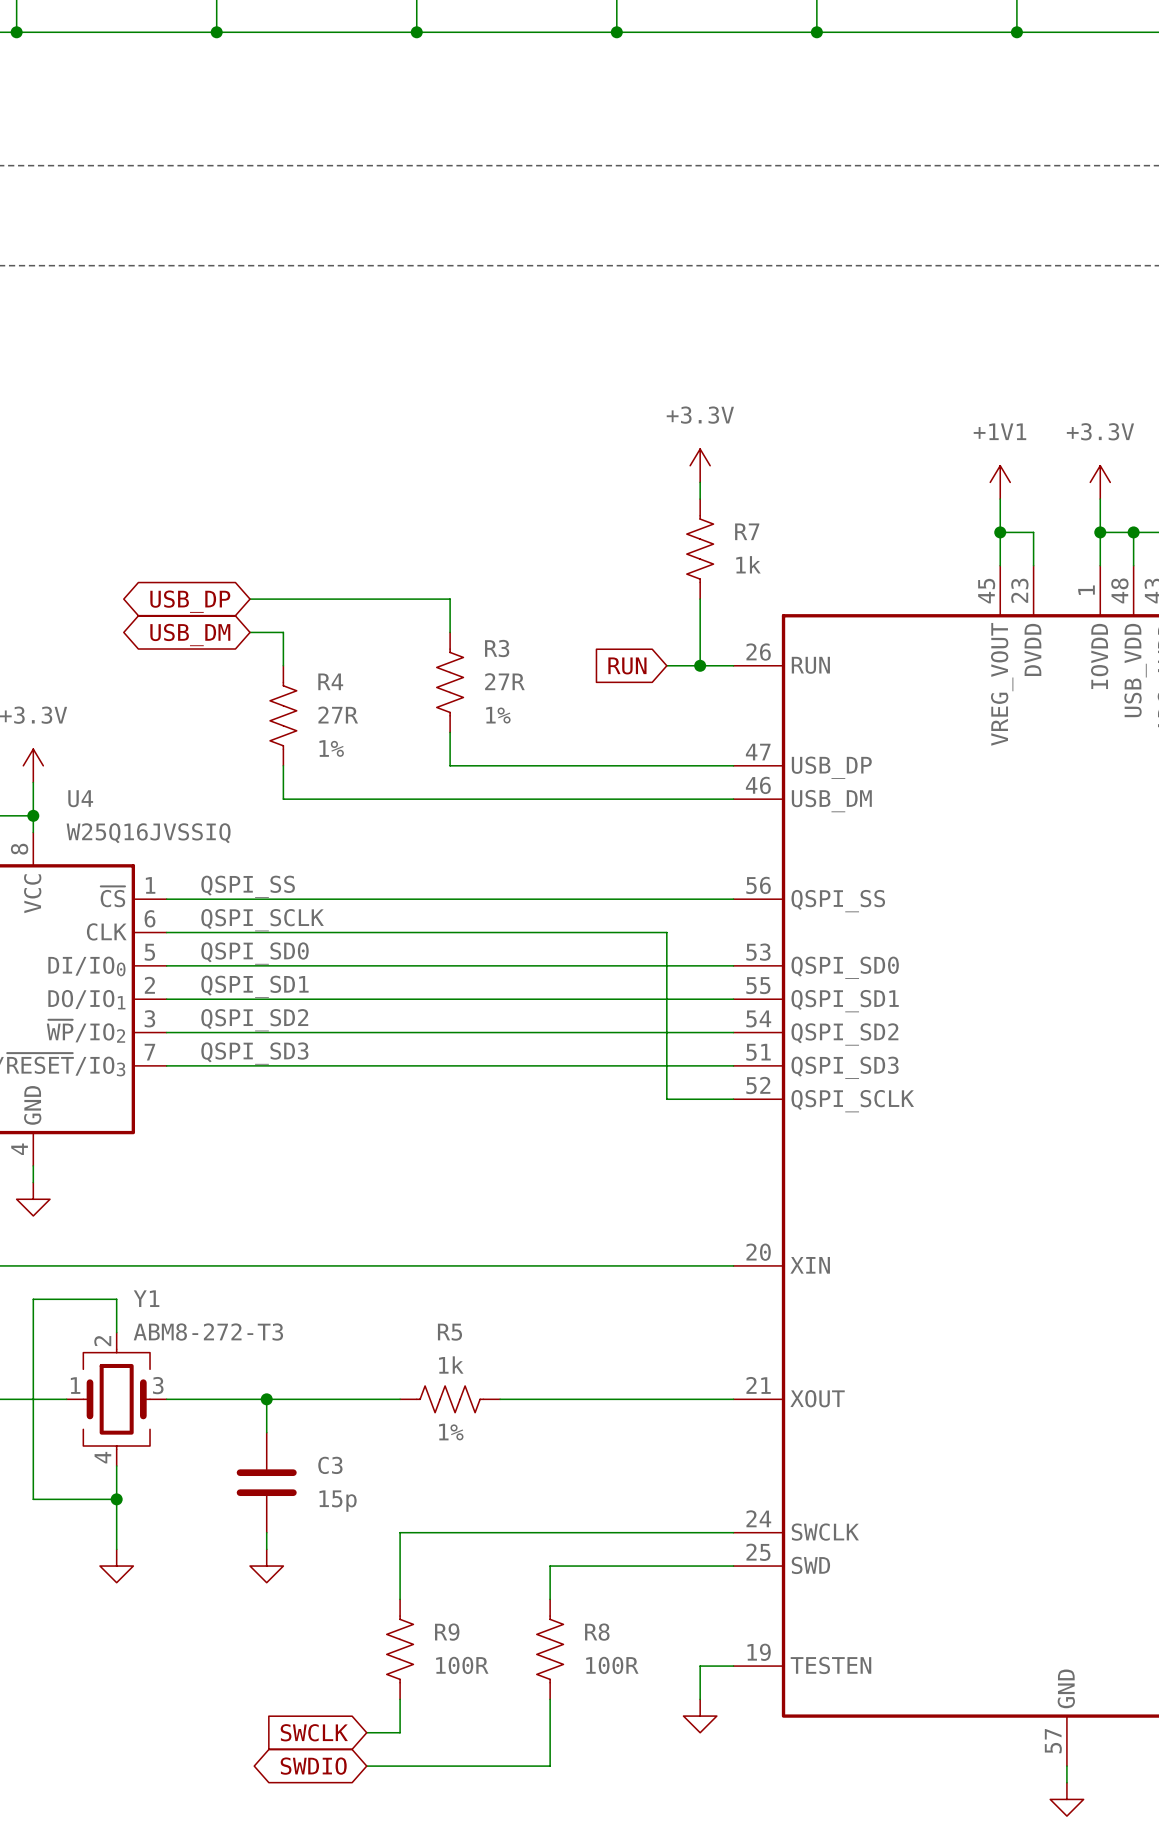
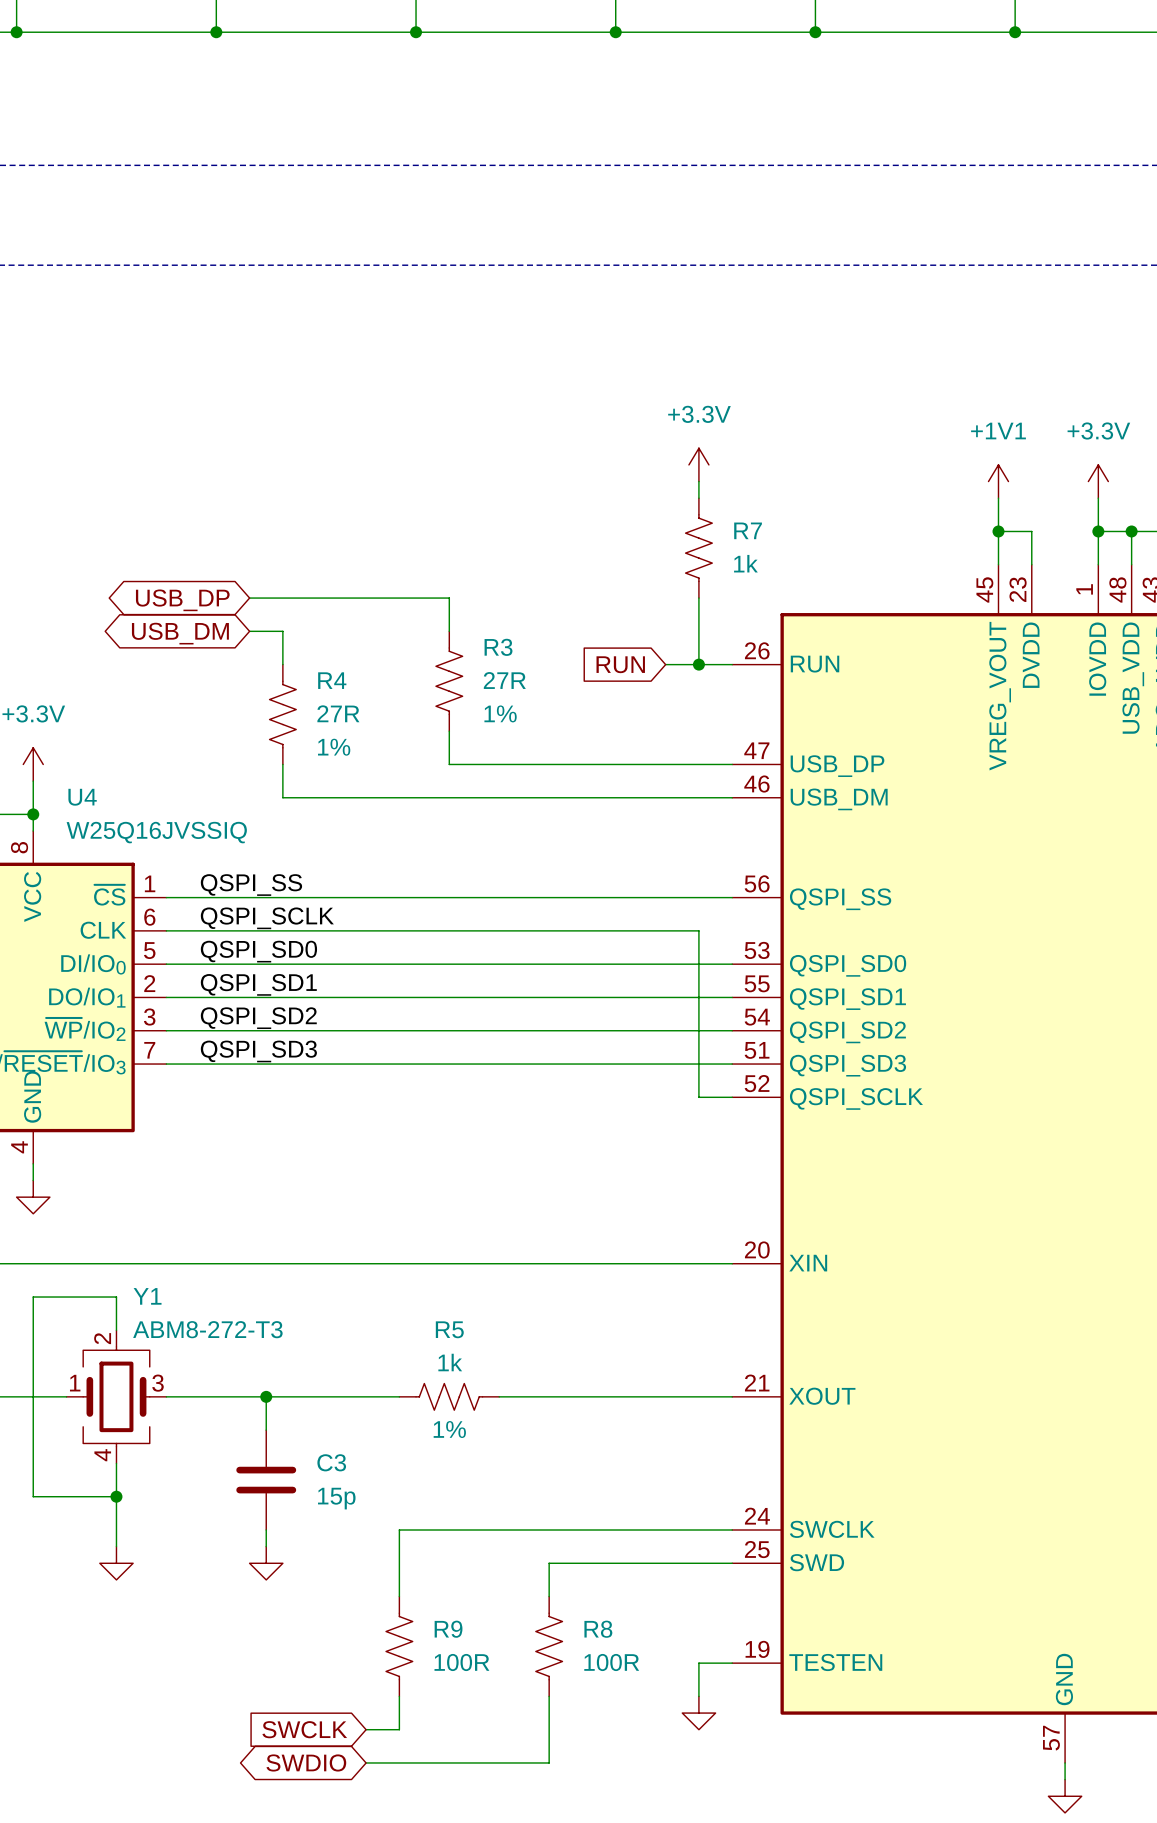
wire: (666, 932) (666, 1099) (700, 1099) -> (665, 930) (698, 930) (698, 1097)

